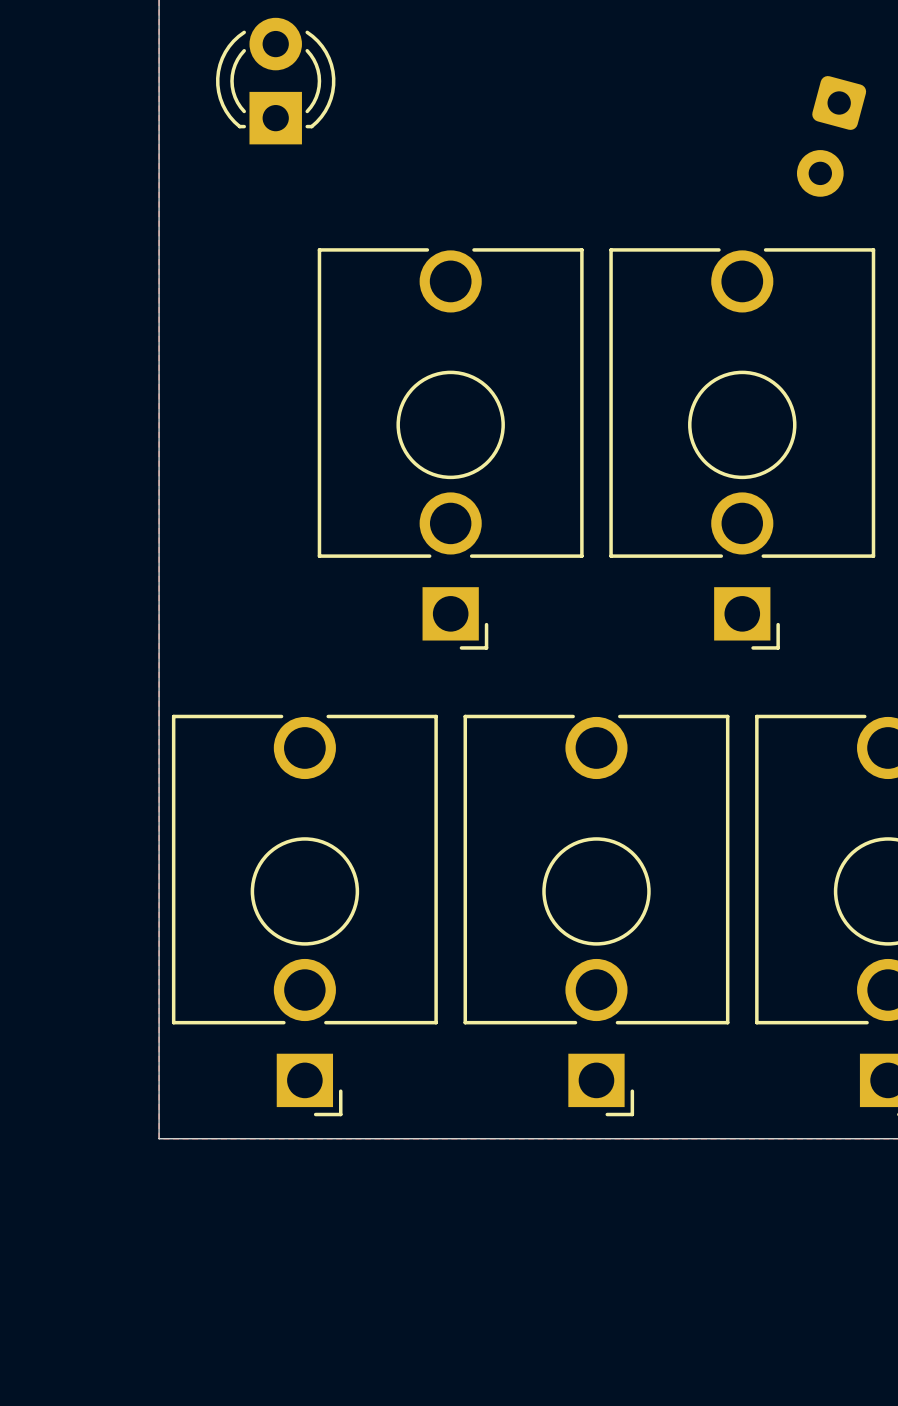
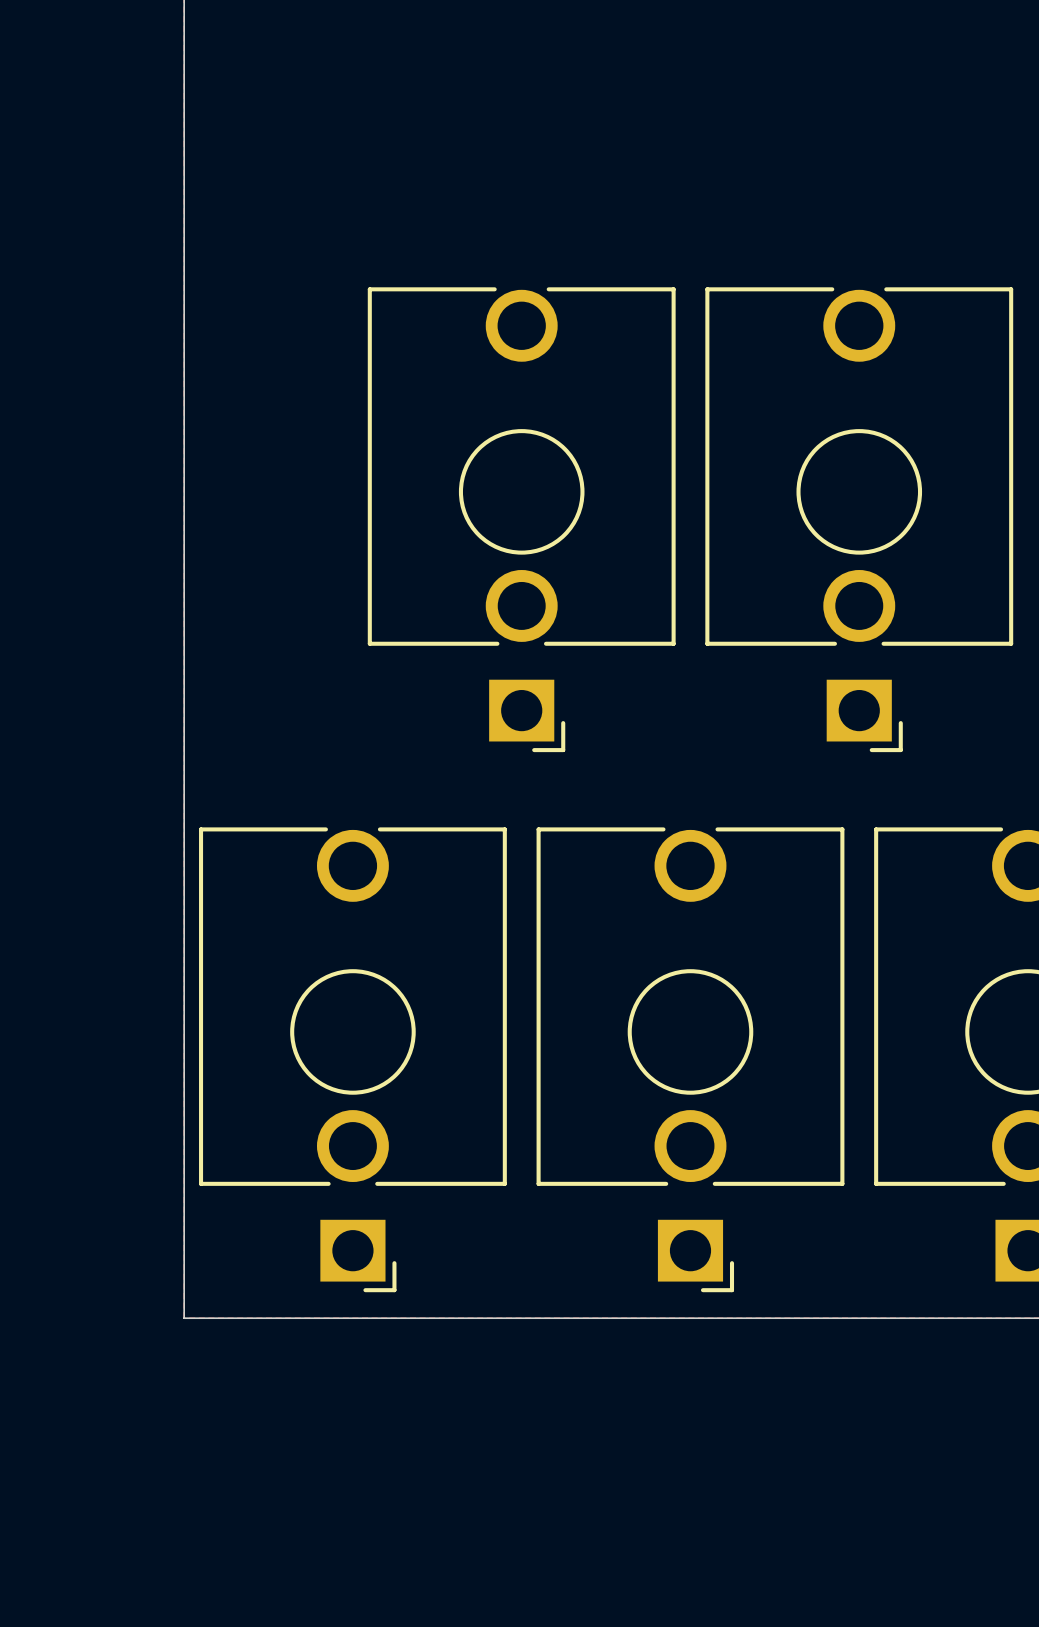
part: (275, 81) -> none
part: (831, 136) -> none

